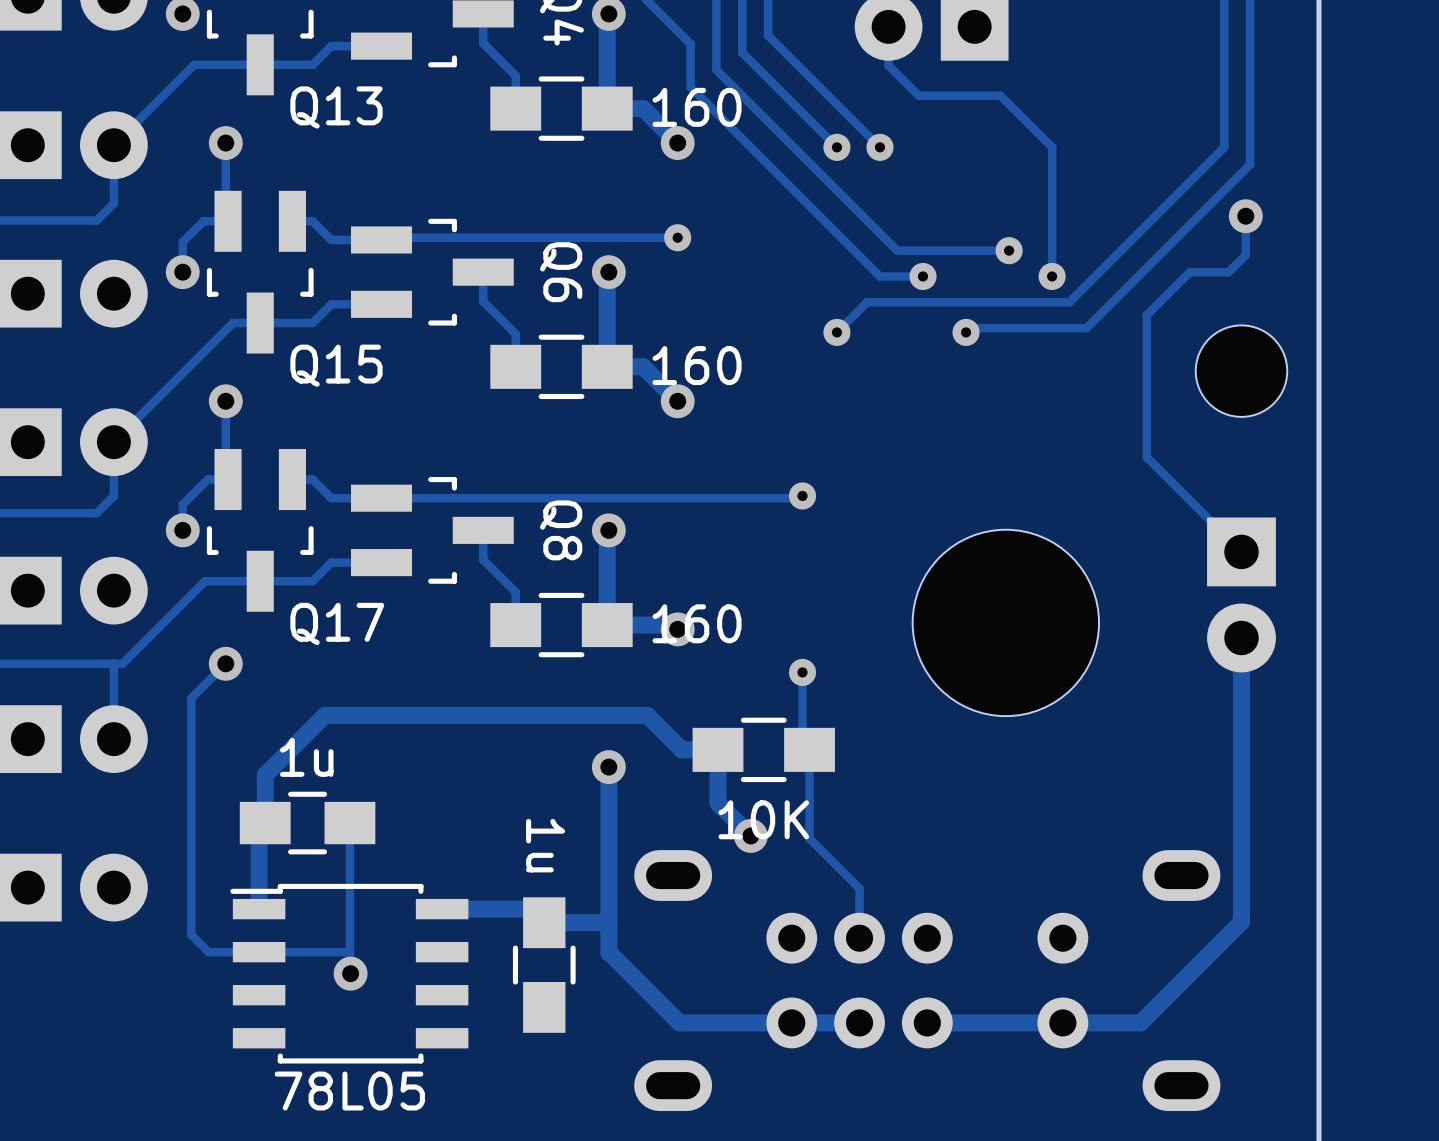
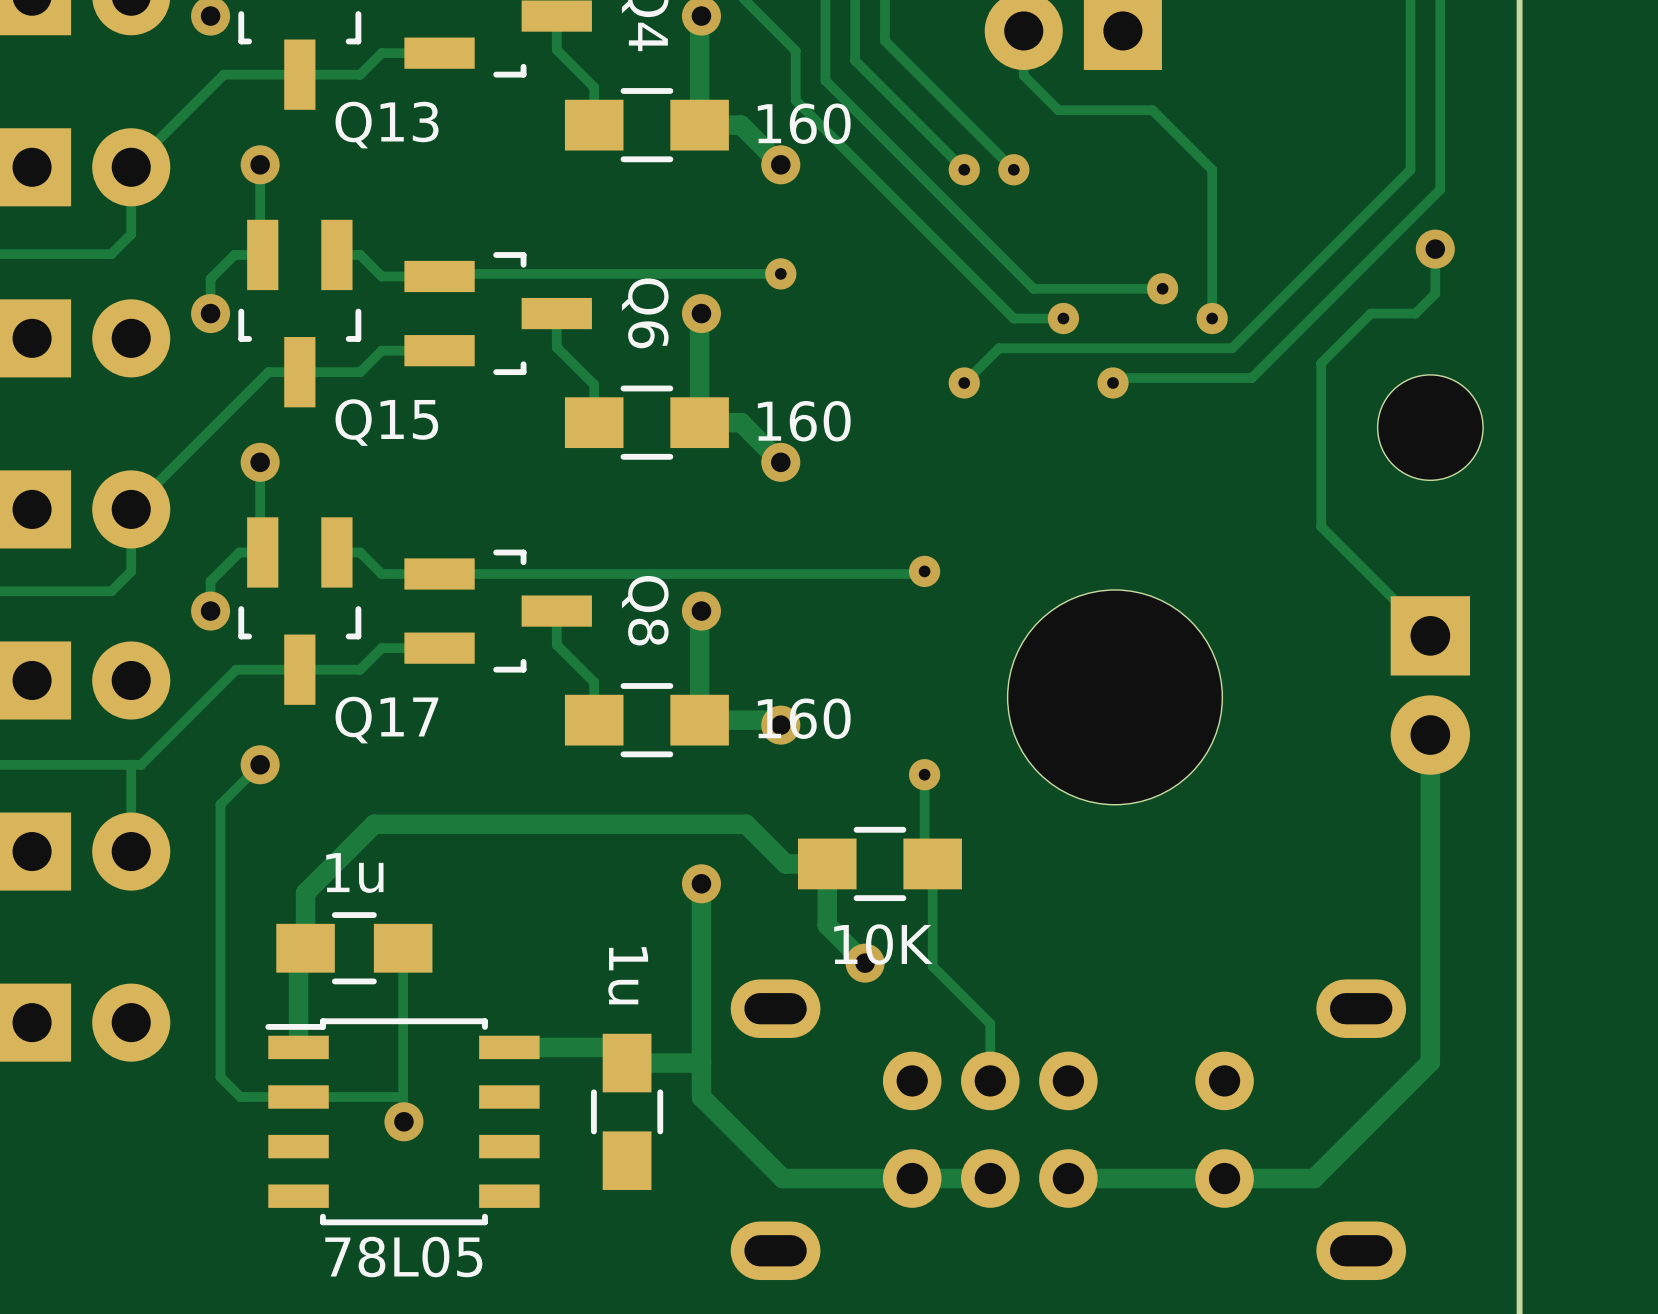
part position: (1005, 622) -> (1114, 697)

